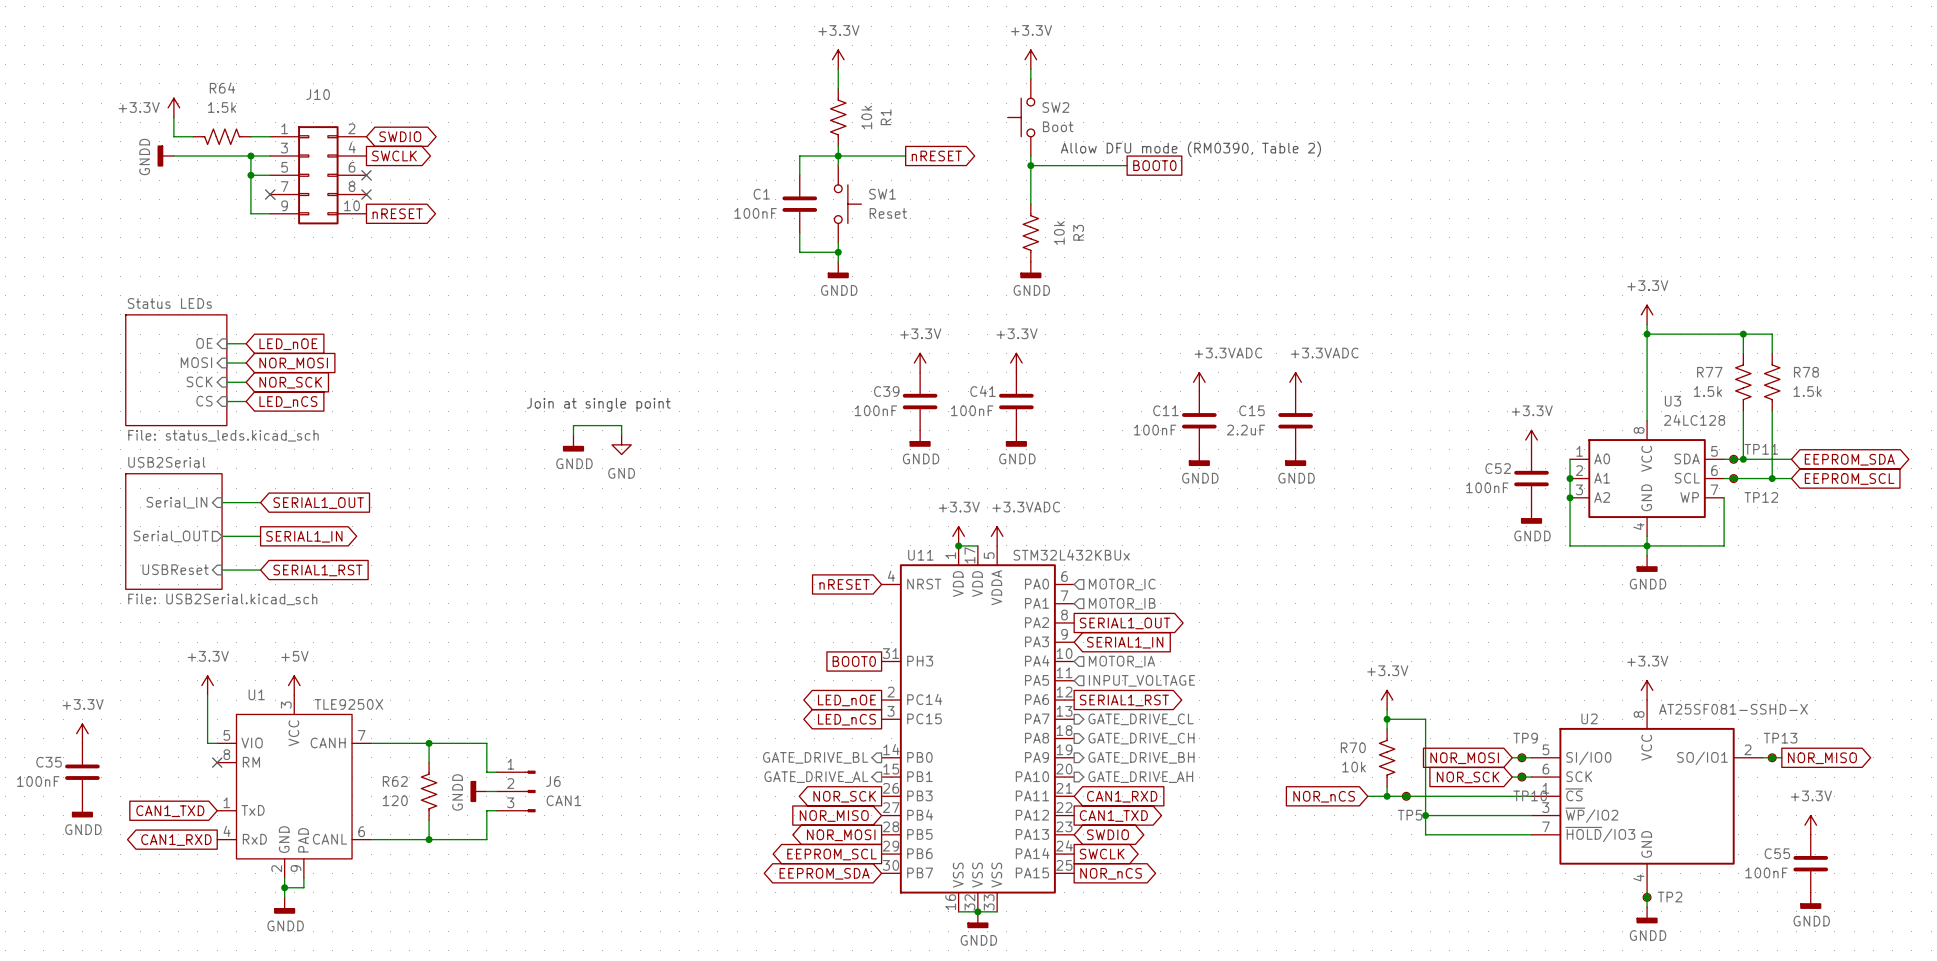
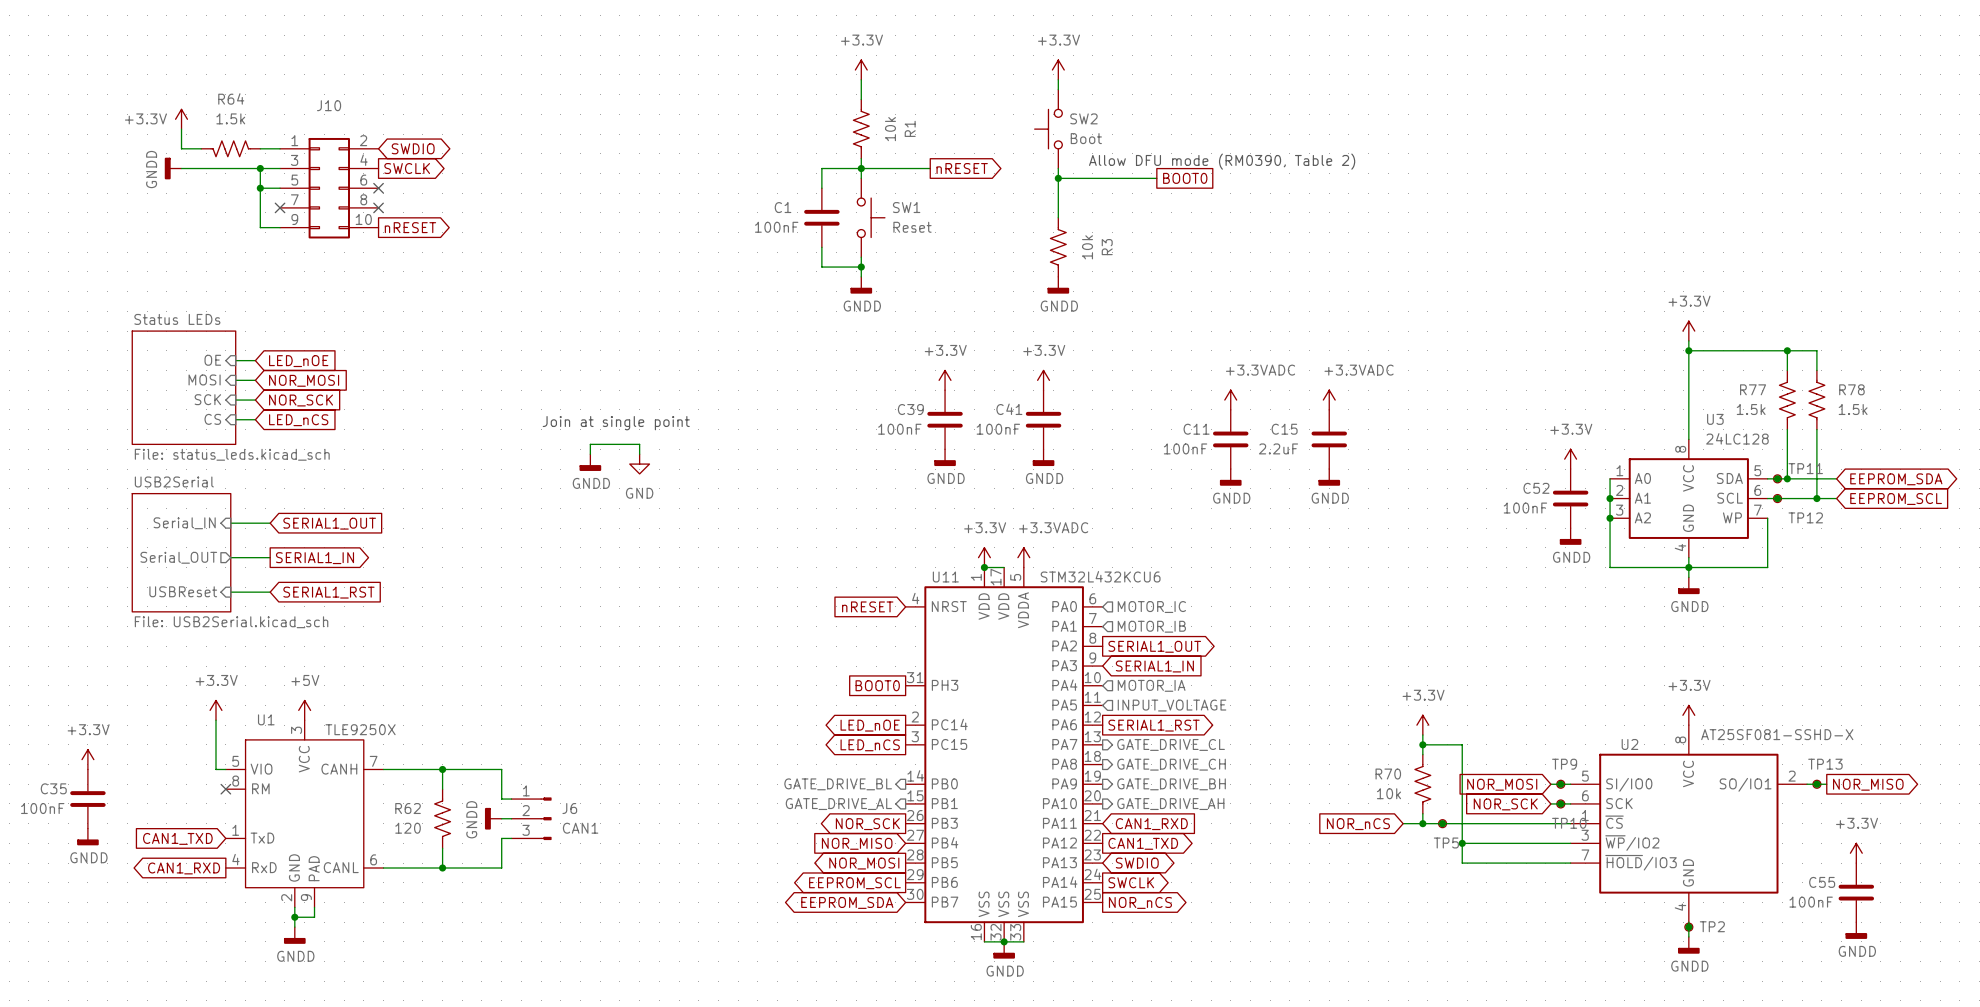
U11 value: STM32L432KBUx (1071, 554) -> STM32L432KCU6 (1100, 576)

